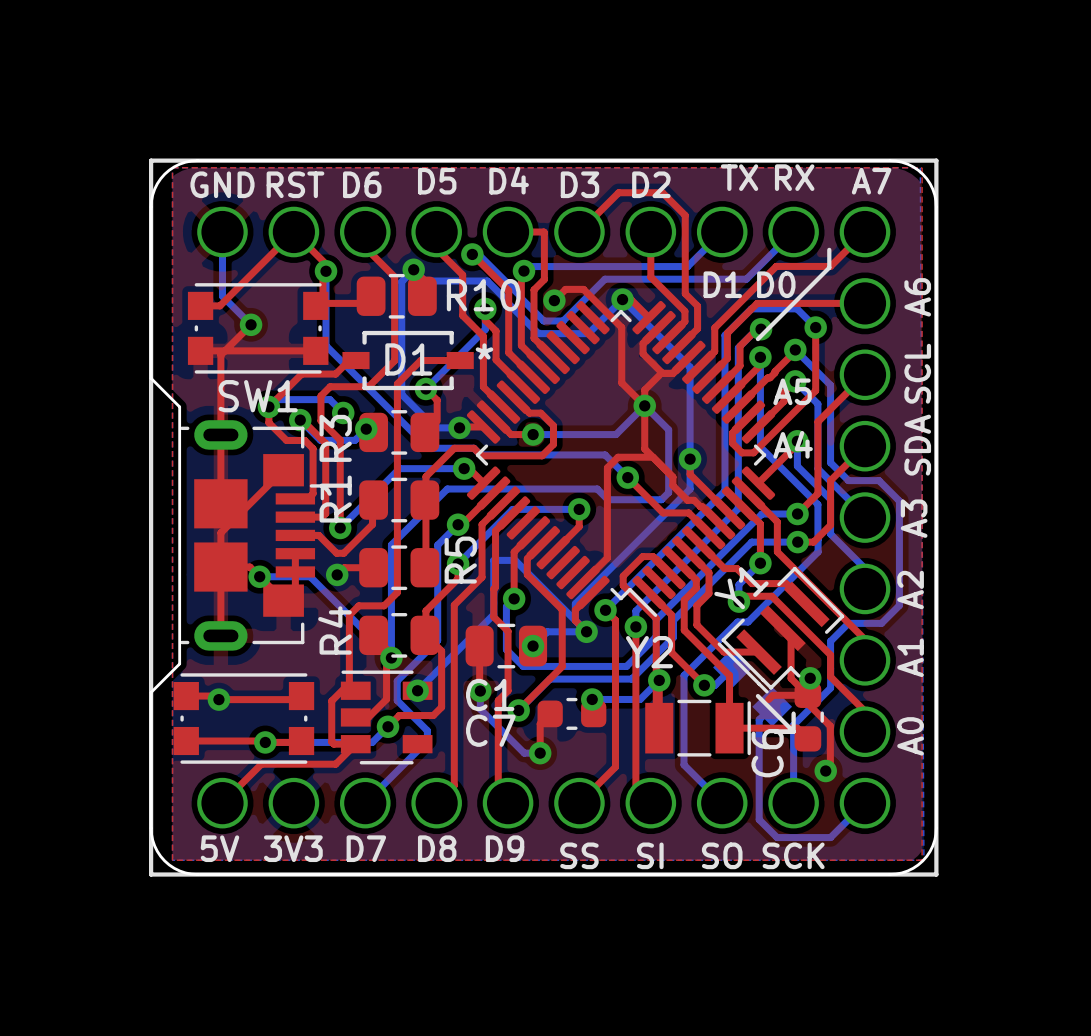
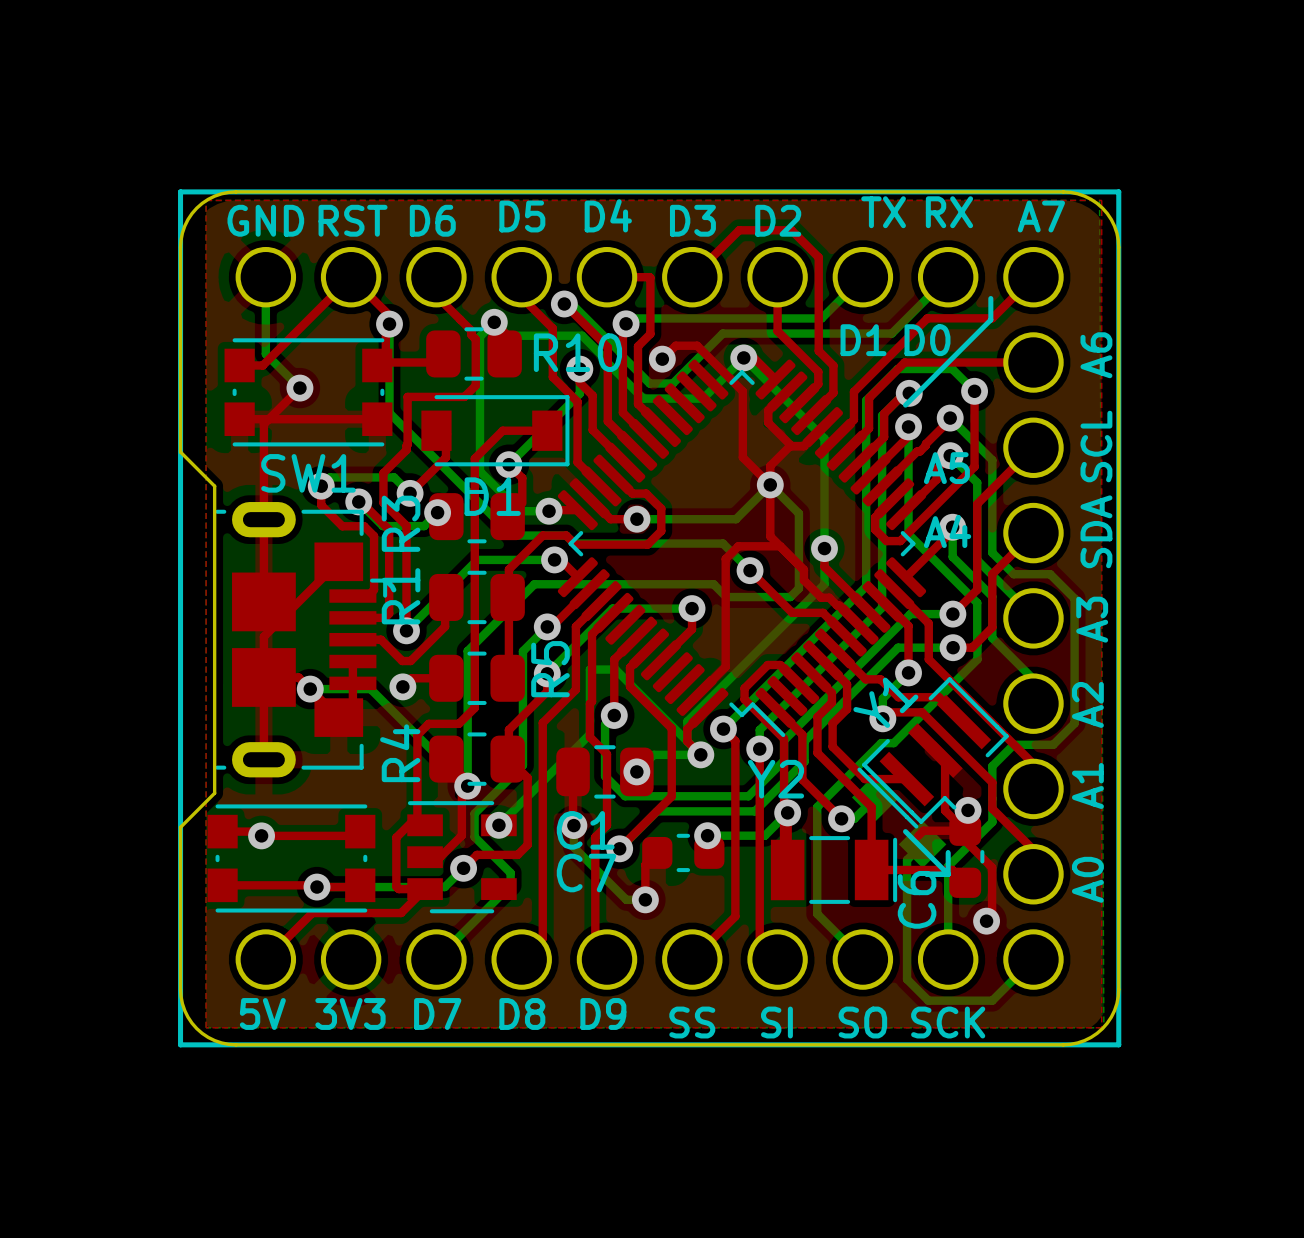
top track: (394, 280) (394, 360) (368, 386) (330, 386) -> (471, 335) (475, 339) (475, 385) (464, 396) (407, 396) (406, 450) (394, 462)
D1 footprint: [342, 330, 474, 391] -> [421, 395, 570, 467]
D1 name position: D1 (408, 359) -> D1 (492, 496)
top track: (355, 360) (349, 360) (335, 374) (301, 374) (268, 406) -> none
top track: none -> (447, 434) (445, 457) (410, 493)

